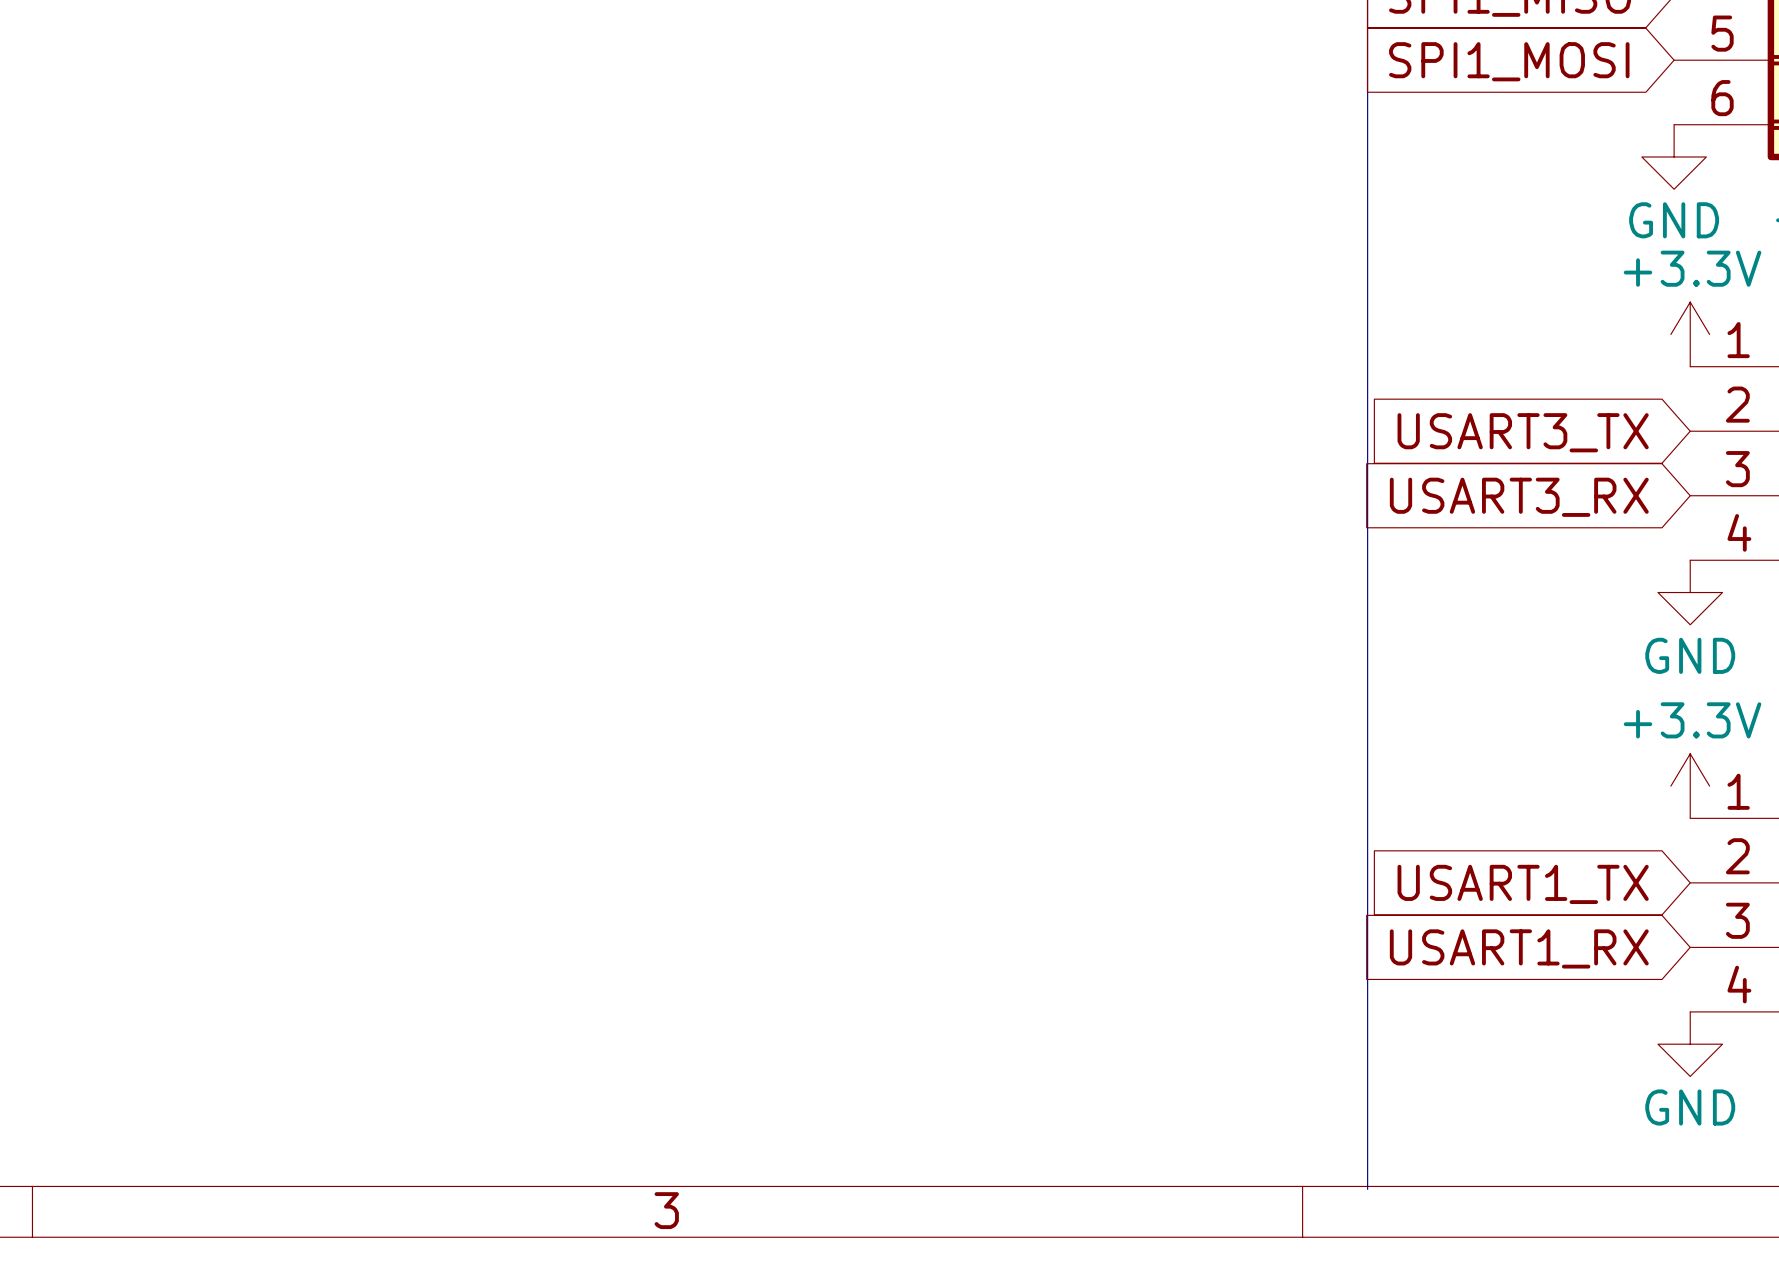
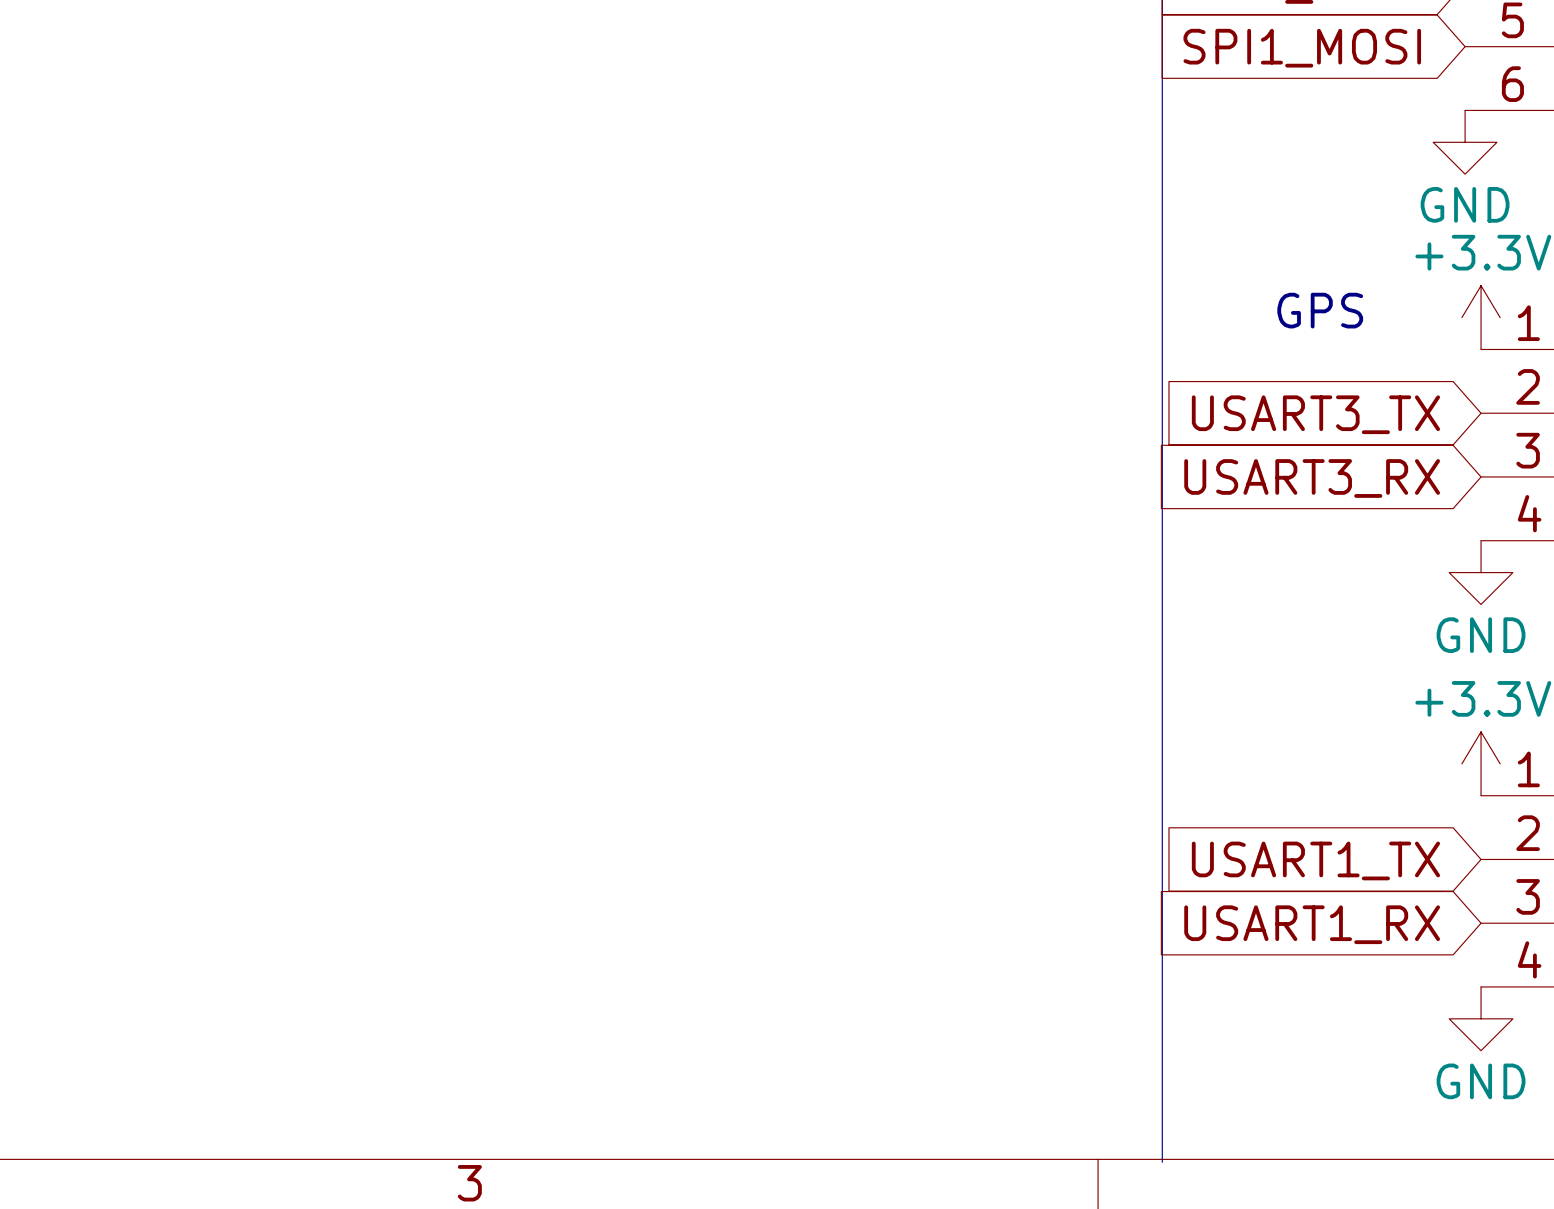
text: none -> GPS (1320, 310)

